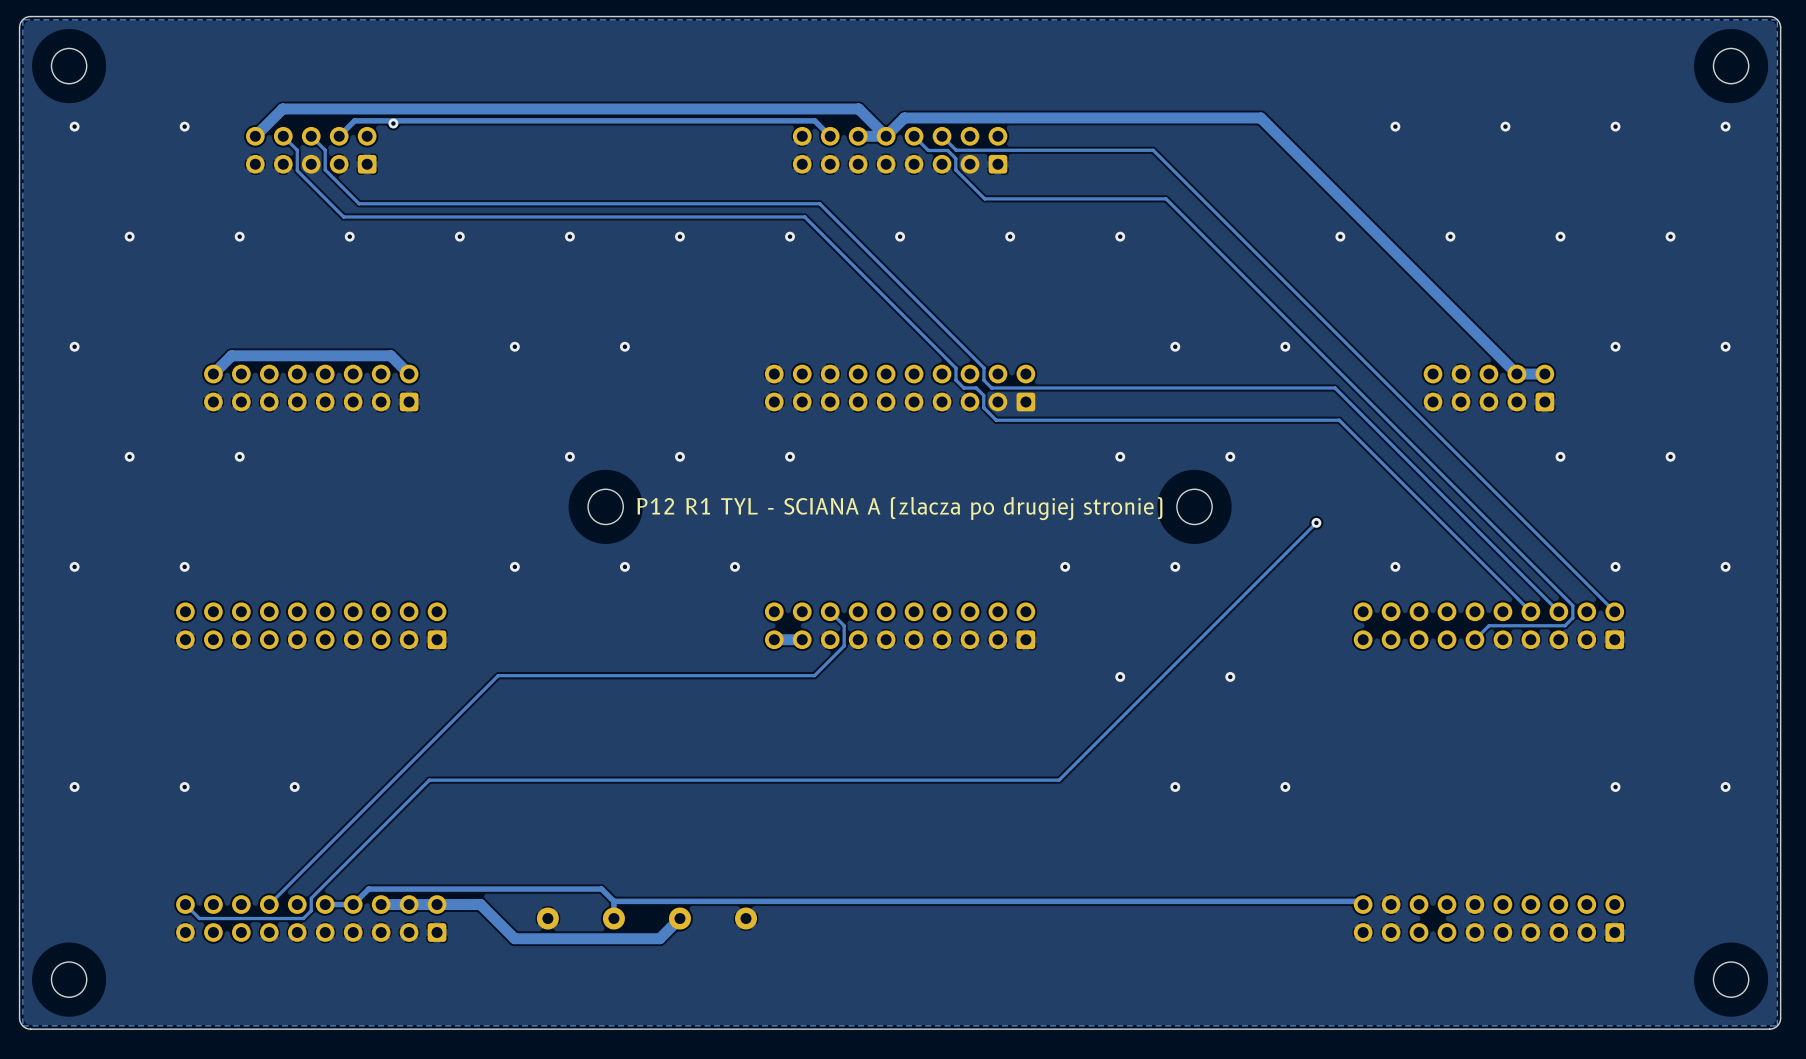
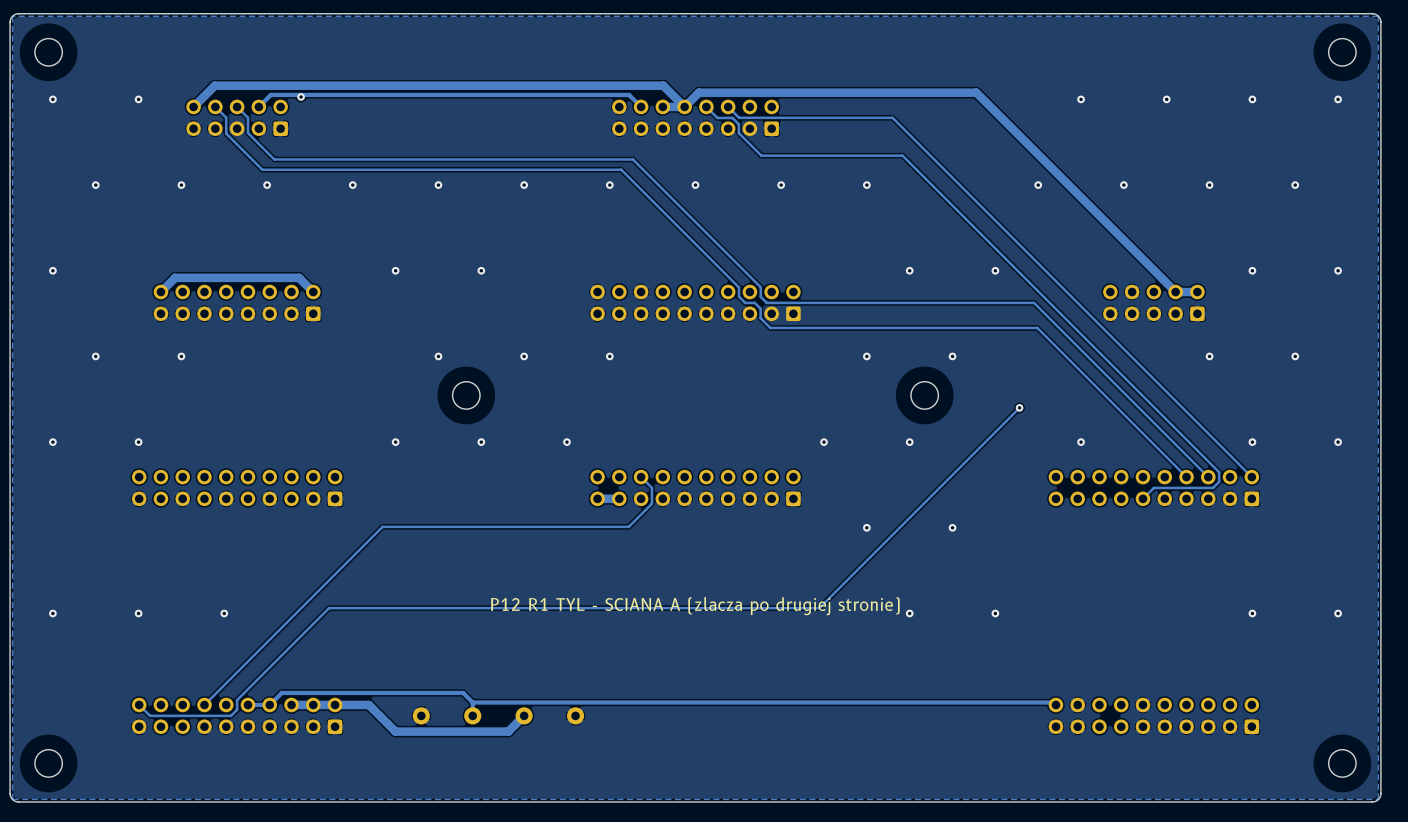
text position: P12 R1 TYL - SCIANA A (zlacza po drugiej stronie) (899, 508) -> P12 R1 TYL - SCIANA A (zlacza po drugiej stronie) (695, 606)

